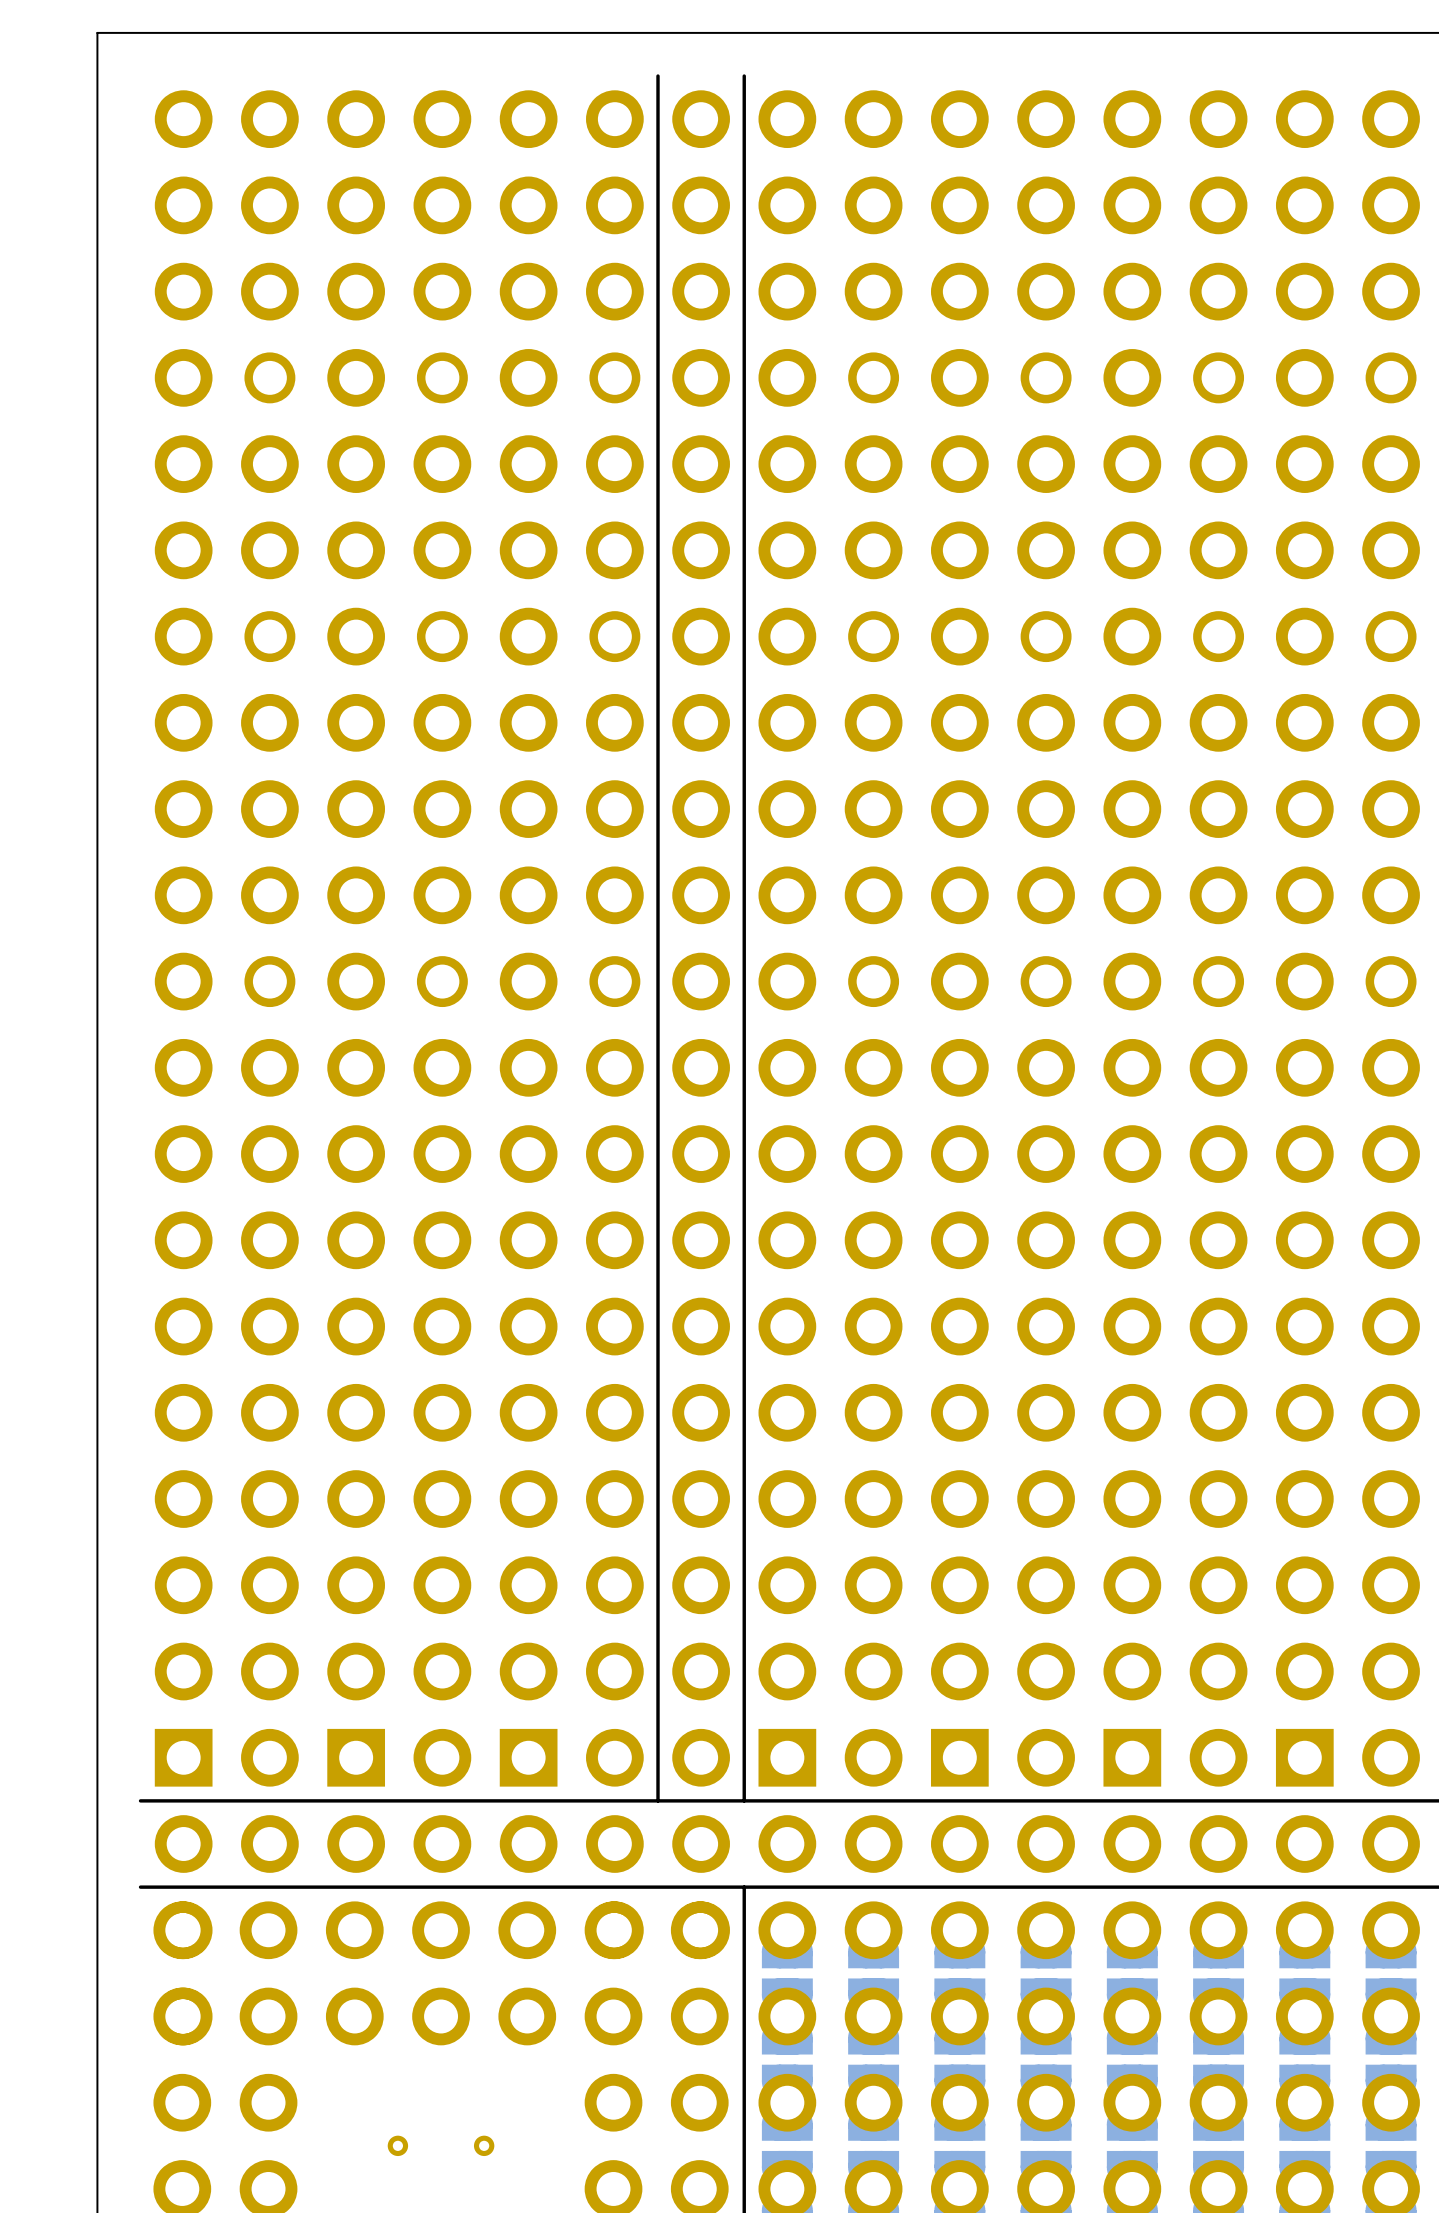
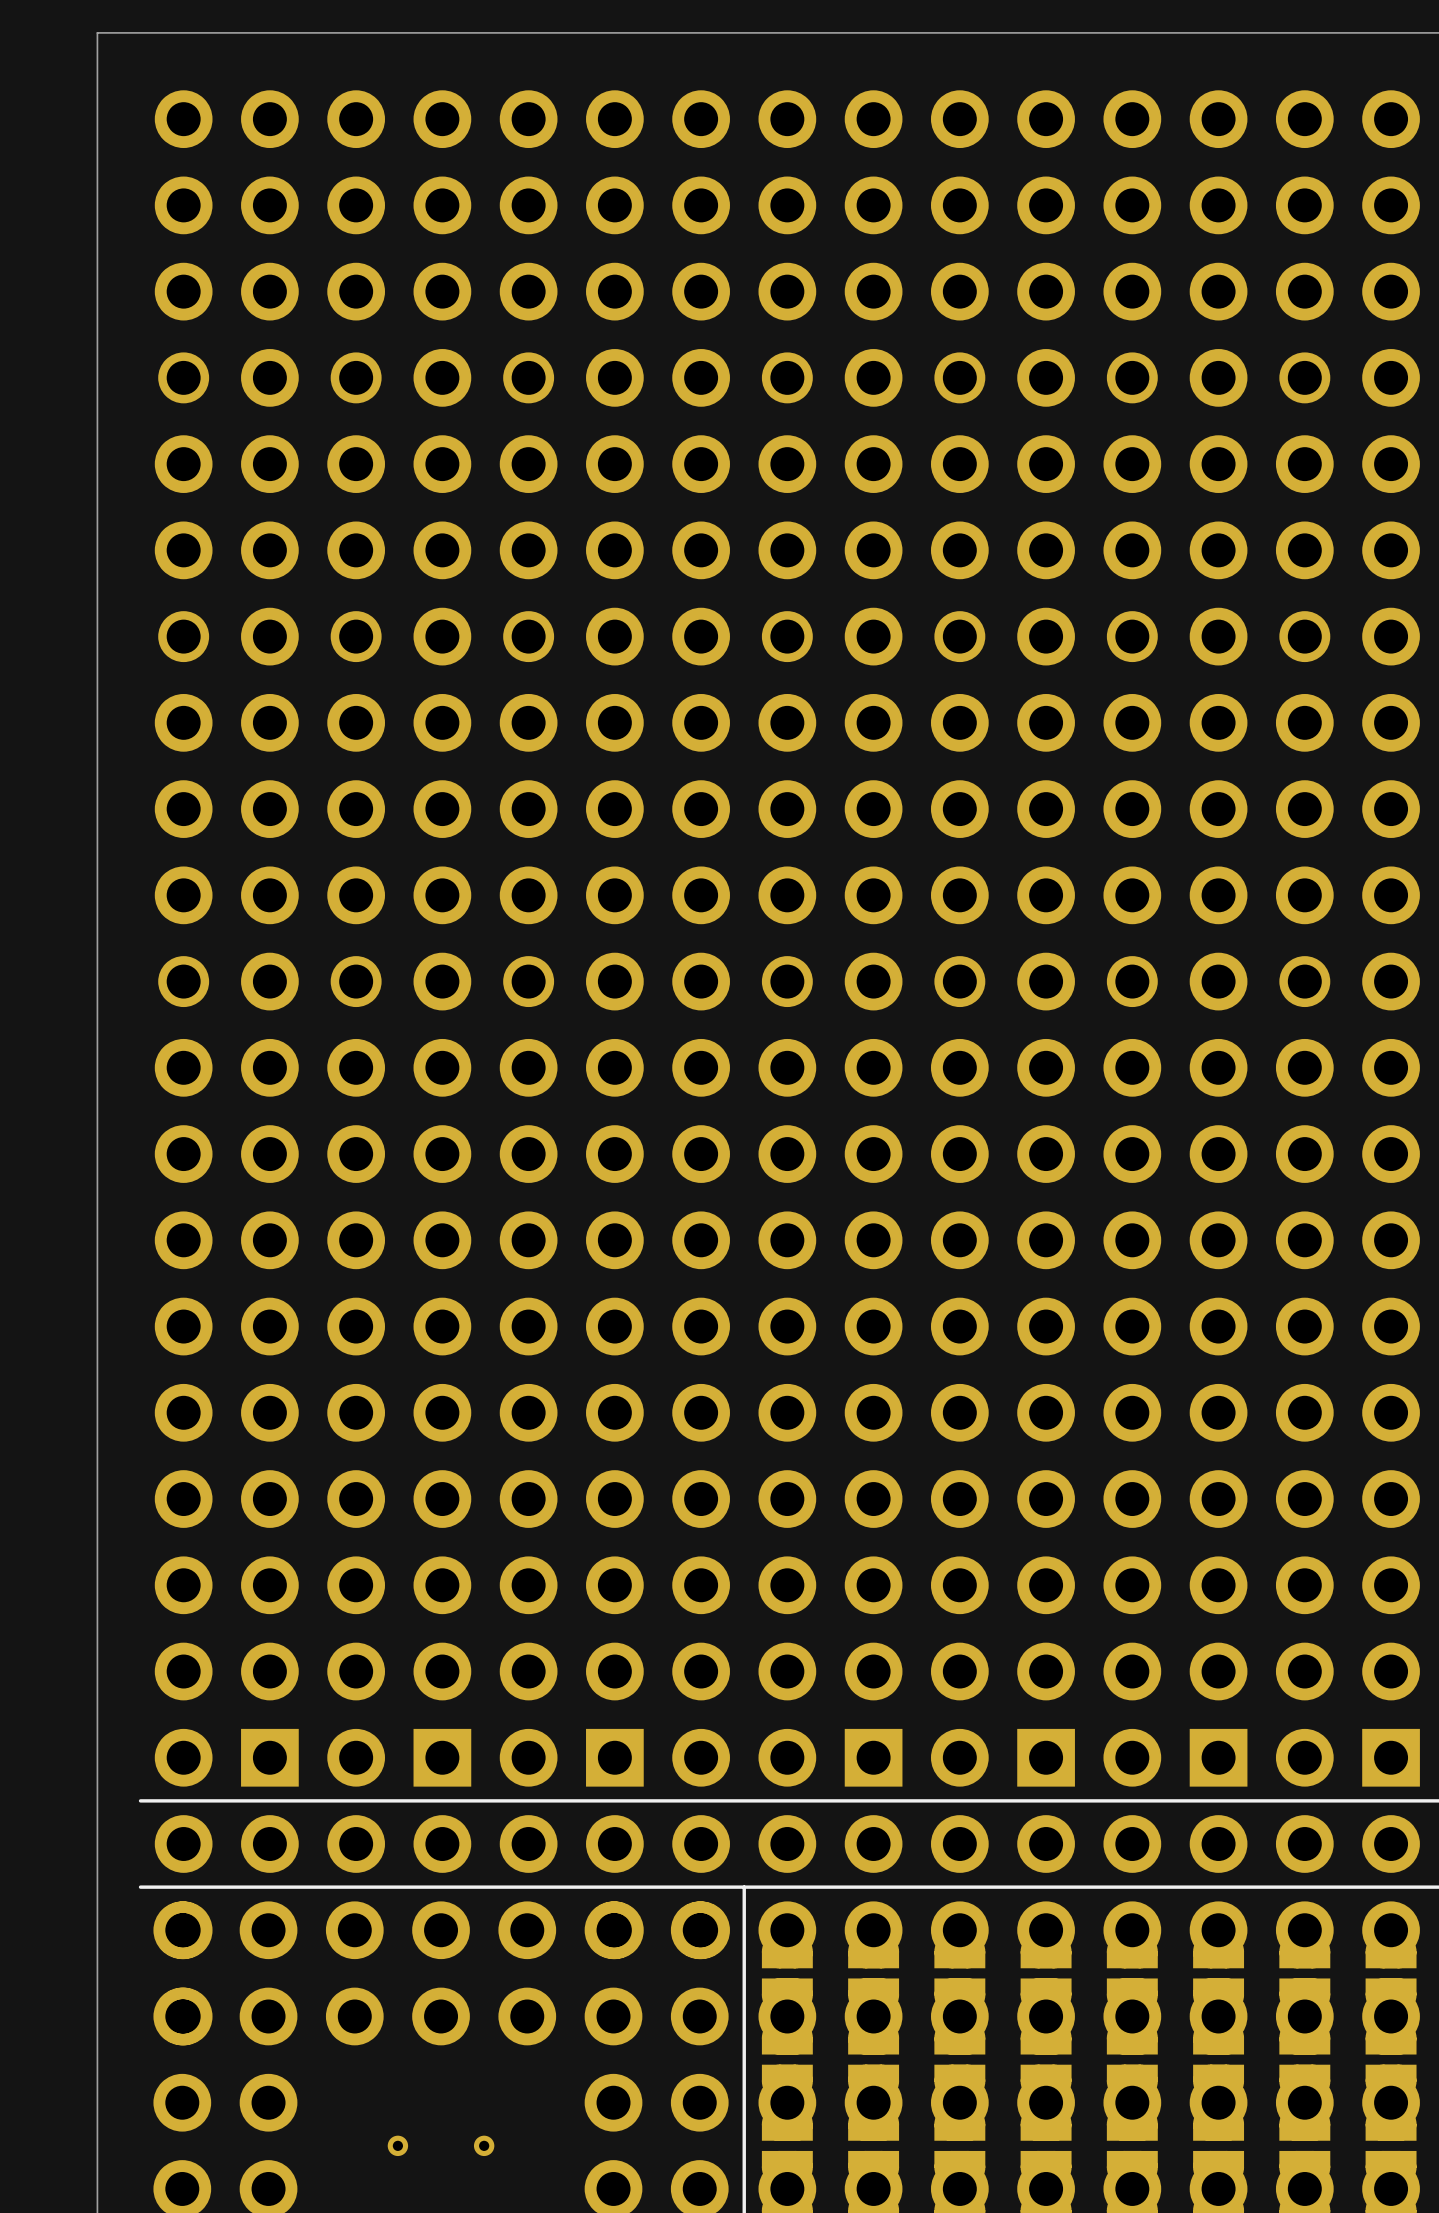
line: (657, 76) (657, 1800) -> none
line: (744, 76) (744, 1800) -> none
part footprint: [154, 90, 299, 1787] -> [154, 90, 299, 1787]
part footprint: [327, 90, 472, 1787] -> [327, 90, 472, 1787]
part footprint: [499, 90, 644, 1787] -> [499, 90, 644, 1787]
part footprint: [758, 90, 903, 1787] -> [758, 90, 903, 1787]
part footprint: [930, 90, 1075, 1787] -> [930, 90, 1075, 1787]
part footprint: [1103, 90, 1248, 1787] -> [1103, 90, 1248, 1787]
part footprint: [1275, 90, 1420, 1787] -> [1275, 90, 1420, 1787]

